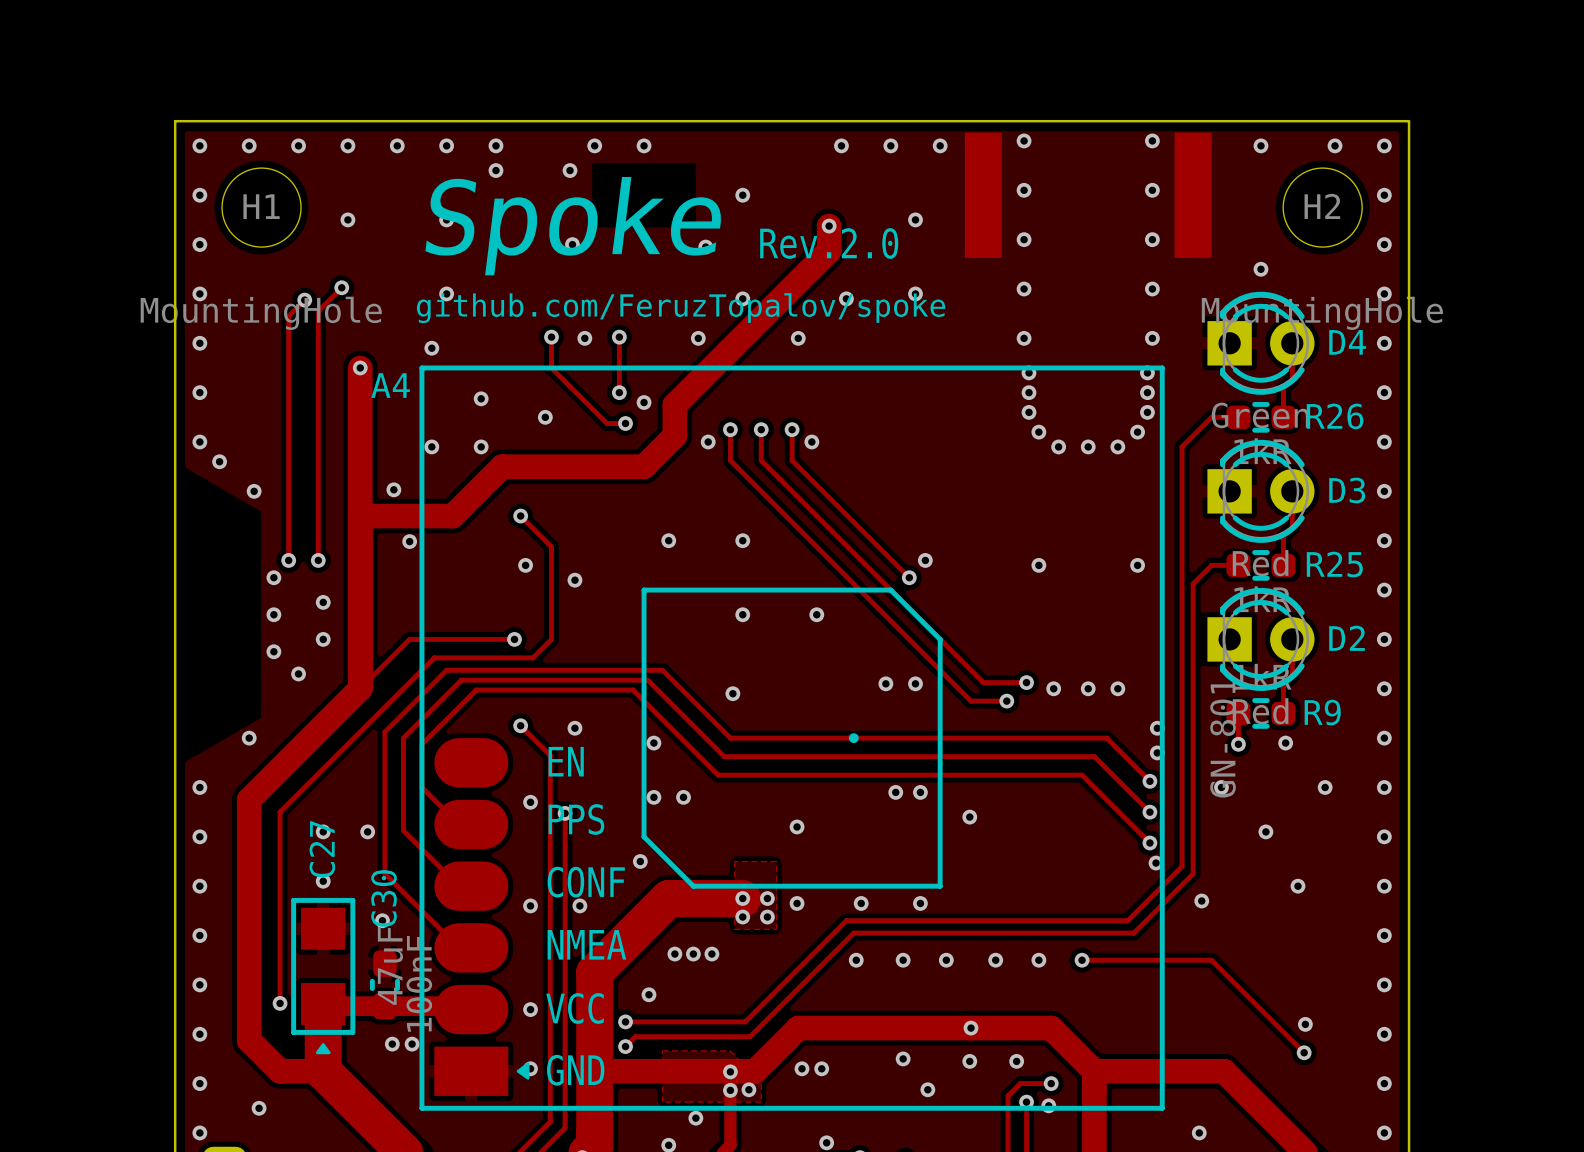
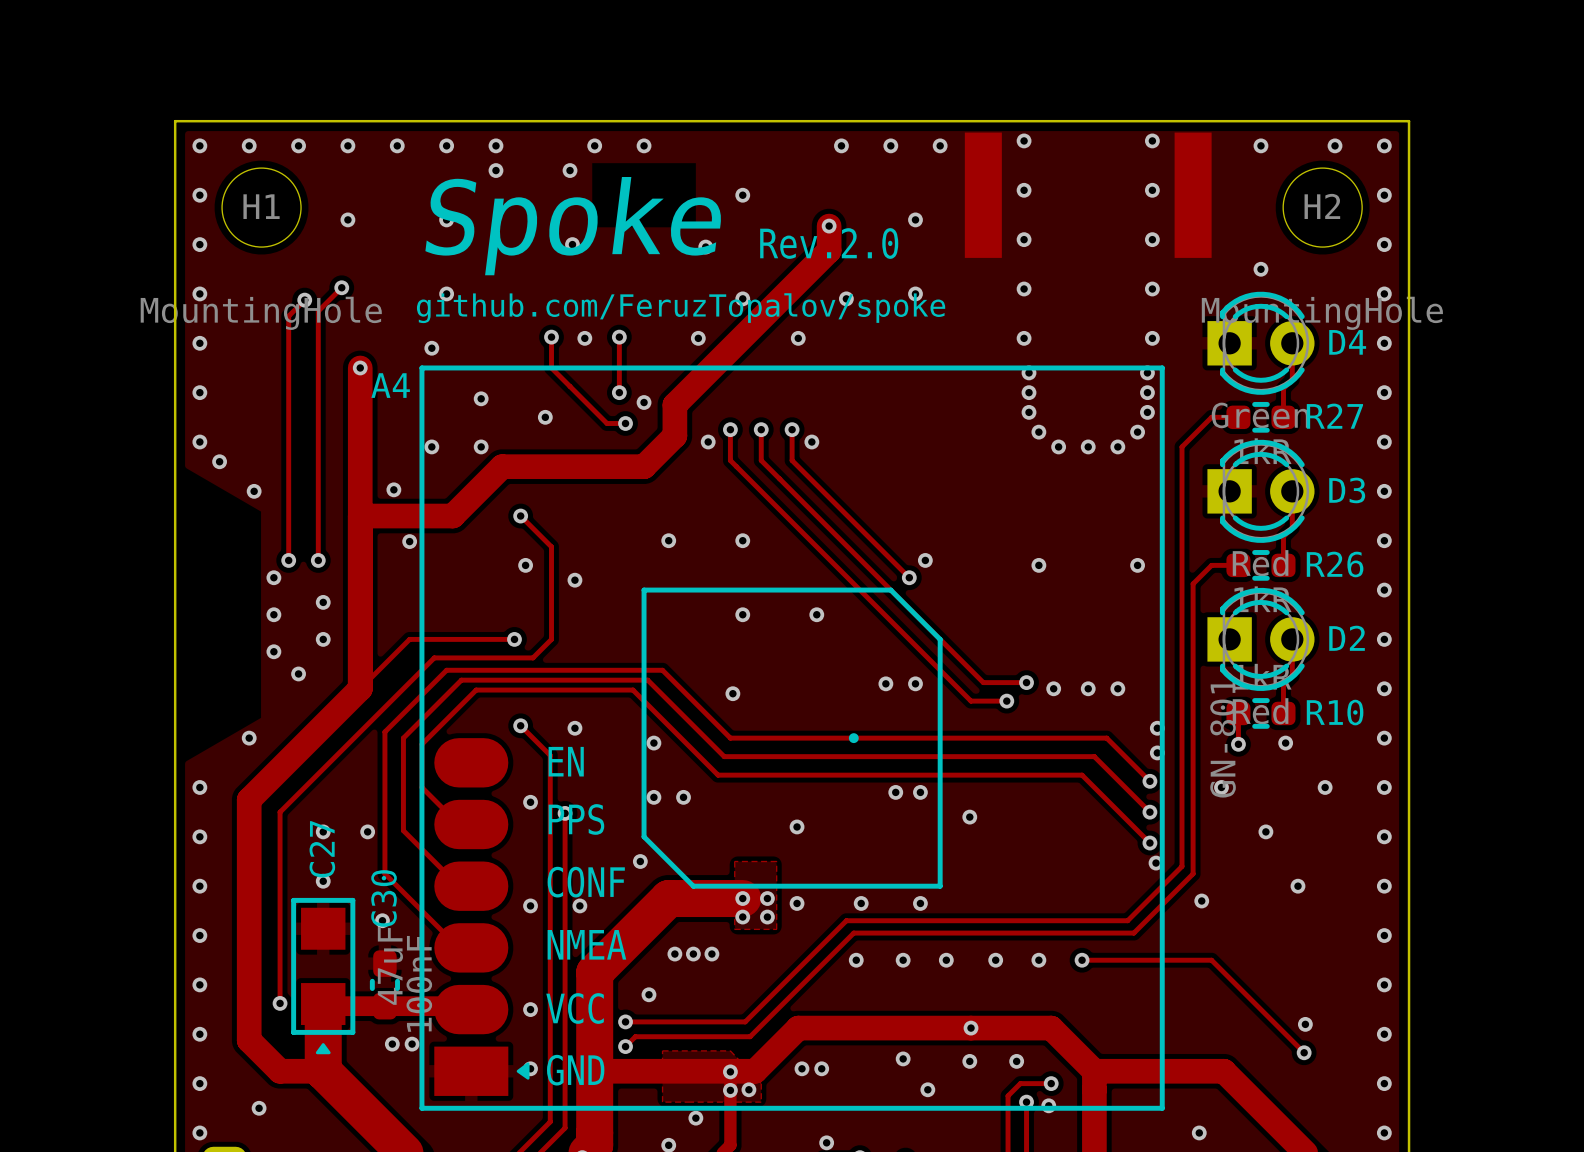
R26 name: R26 (1335, 416) -> R27 (1334, 416)
R25 name: R25 (1334, 564) -> R26 (1335, 564)
R9 name: R9 (1322, 712) -> R10 (1335, 712)

